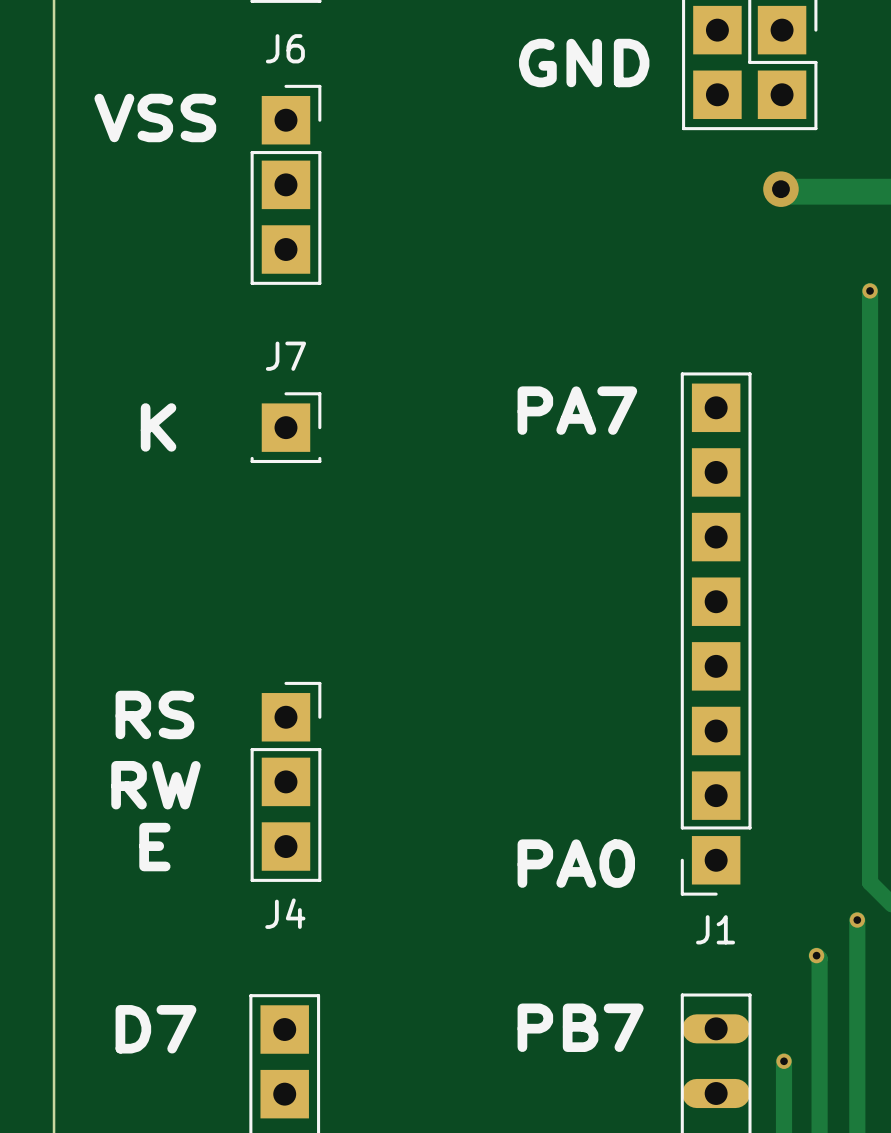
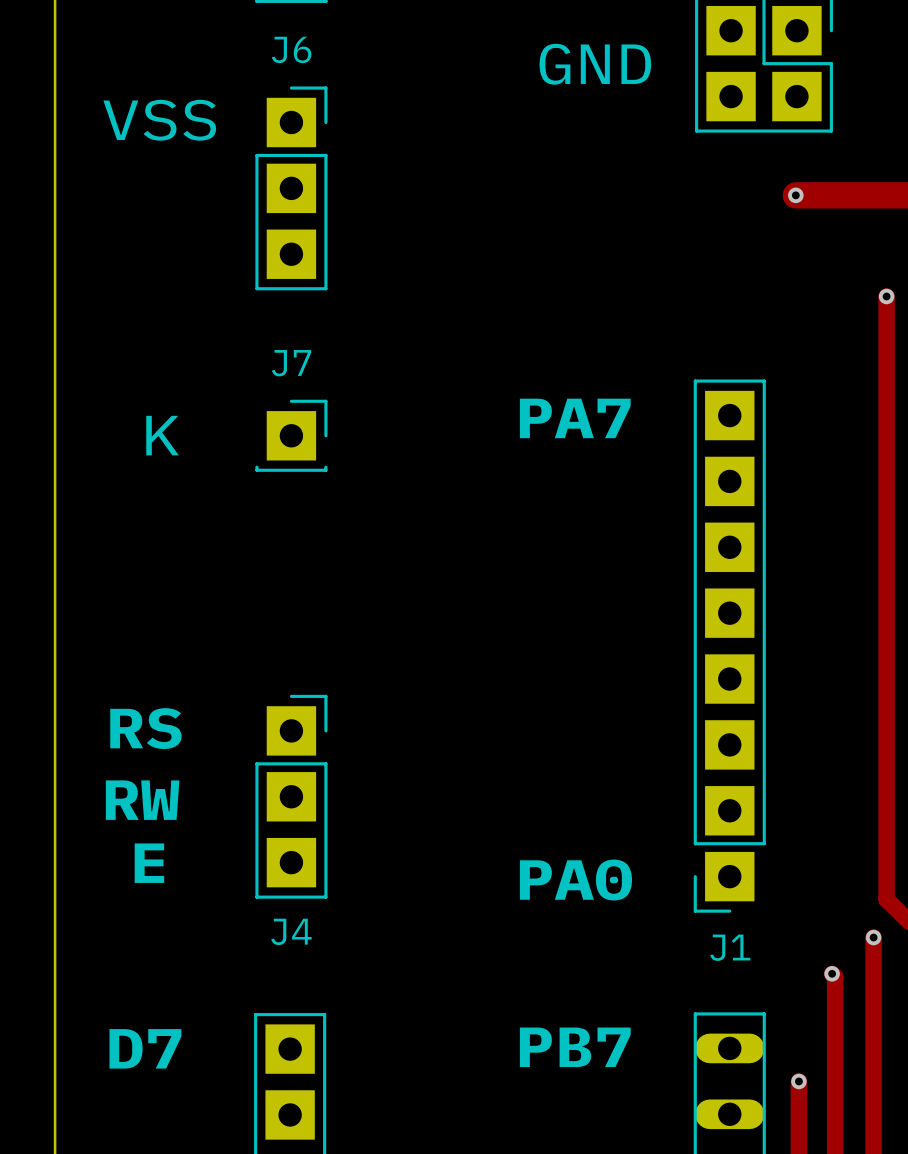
via size: [763, 171, 799, 207] -> [788, 187, 804, 204]

